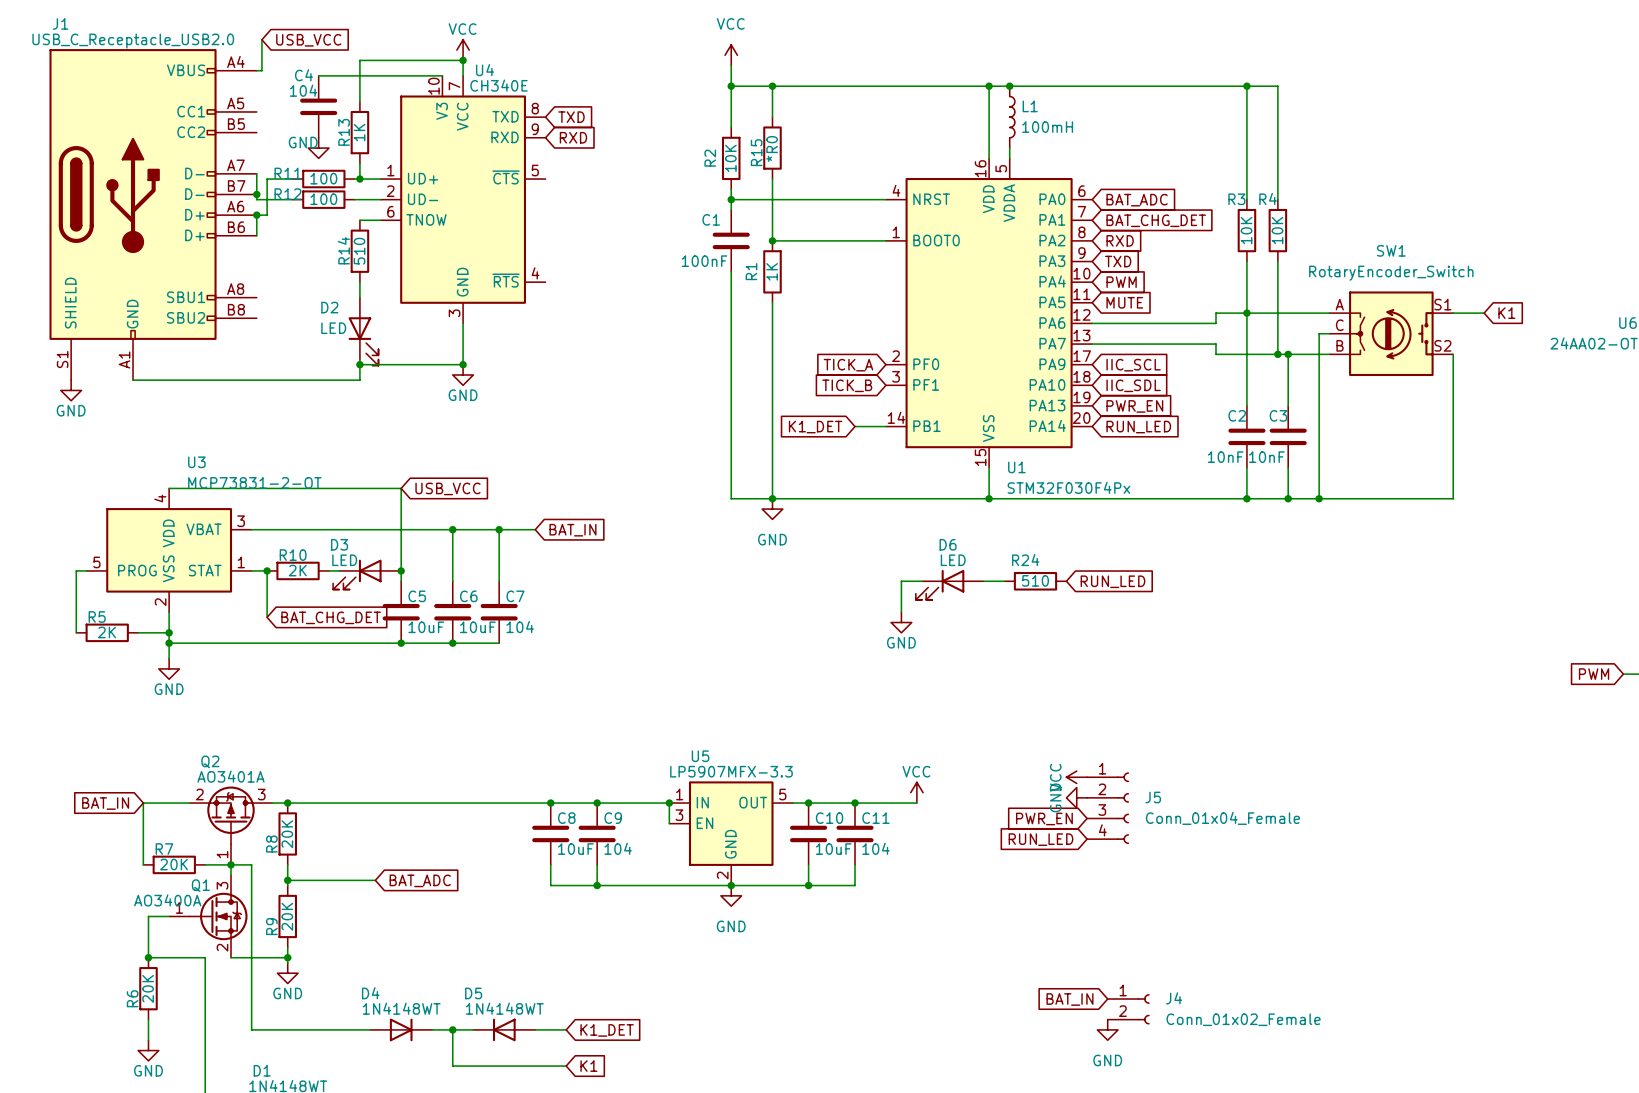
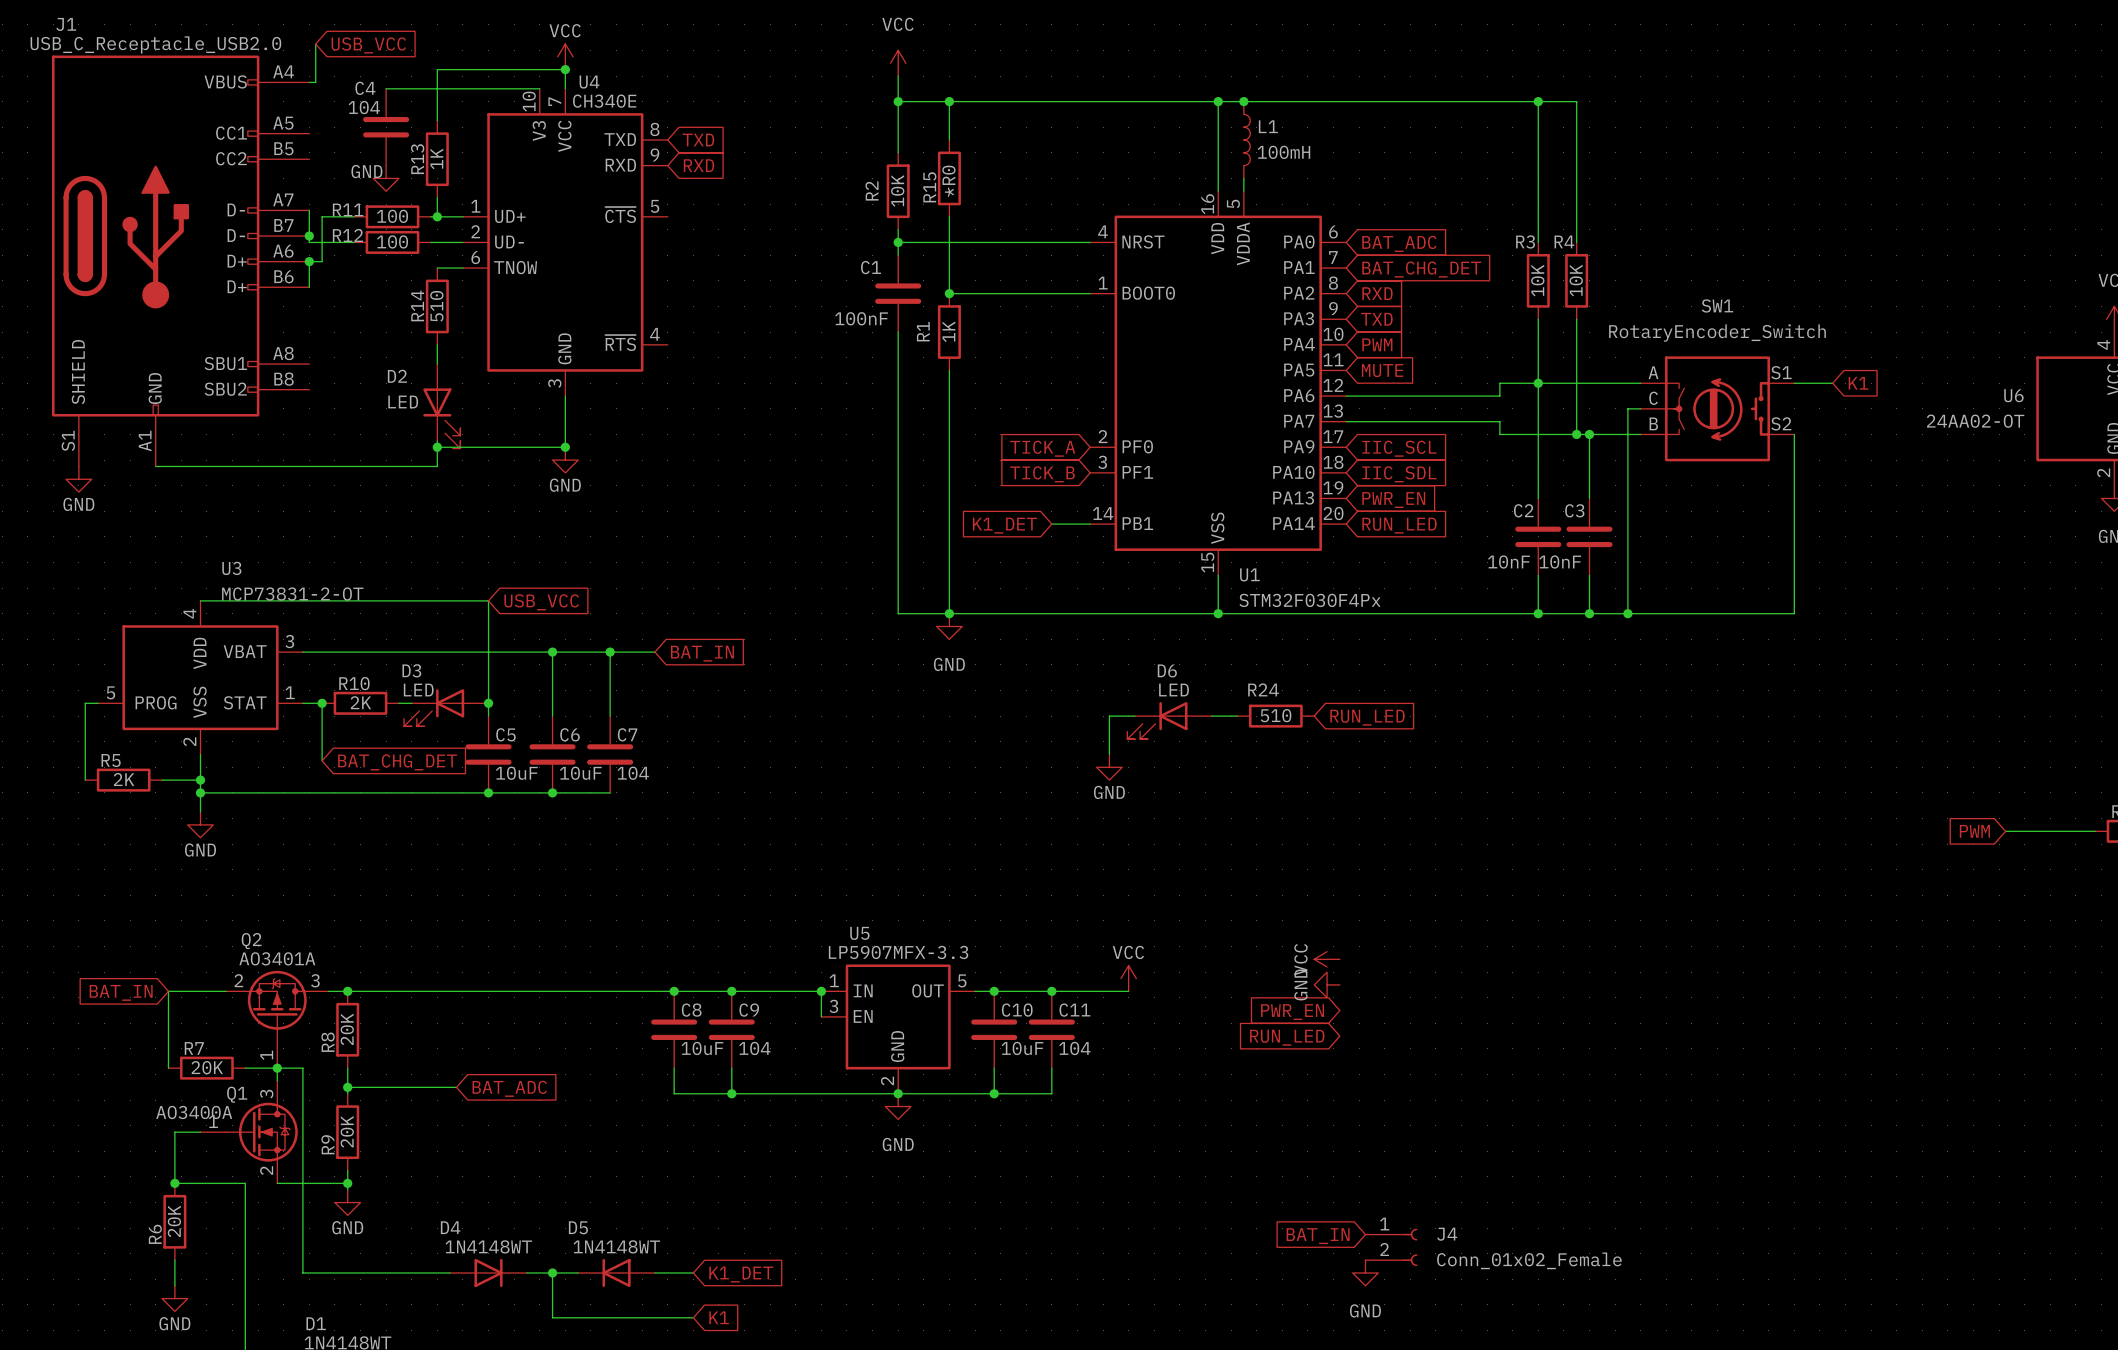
J5: Conn_01x04_Female (1108, 808) -> none

